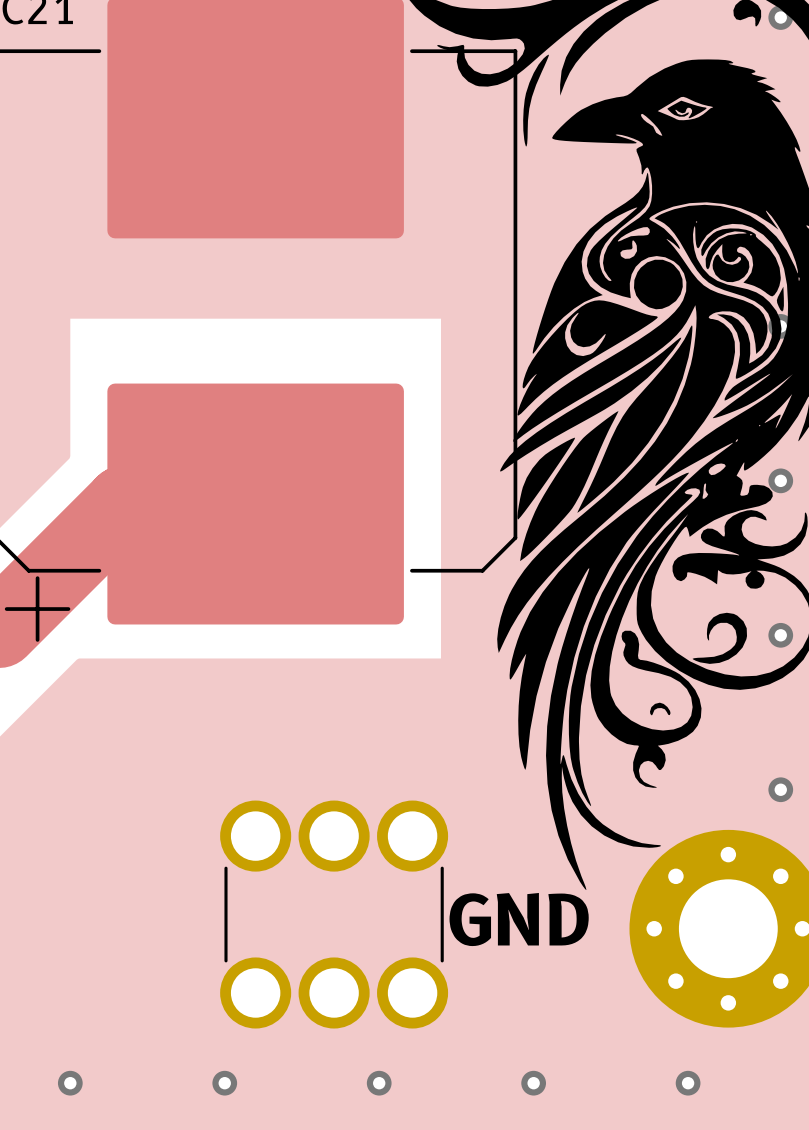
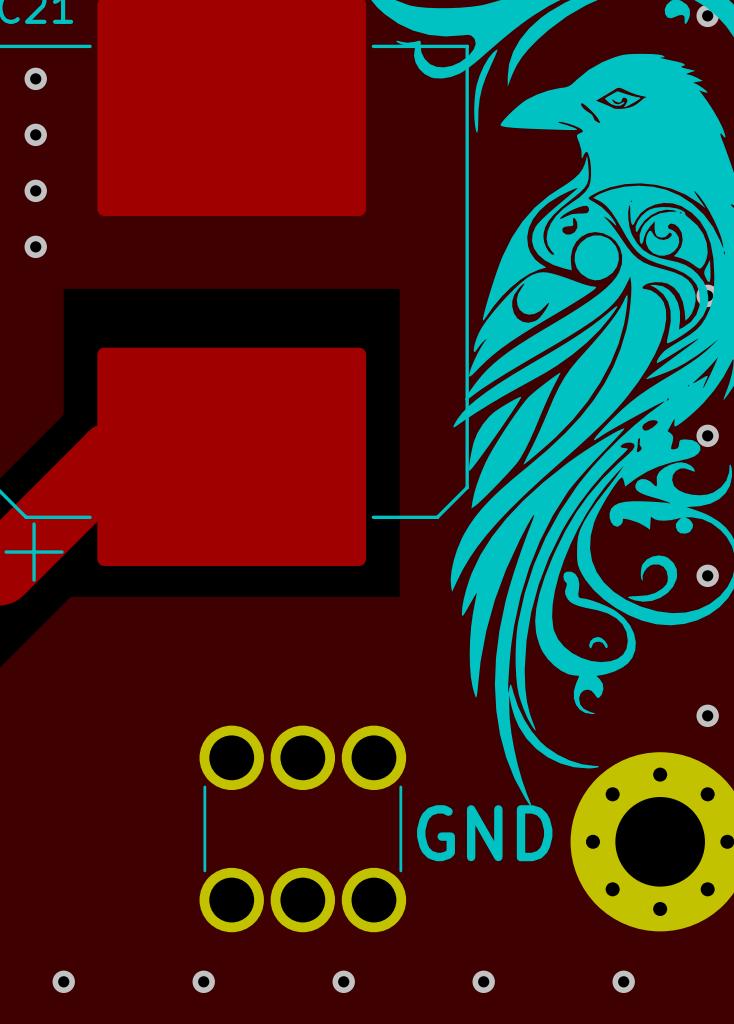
via: none -> (35, 78)
via: none -> (35, 134)
via: none -> (35, 190)
via: none -> (35, 246)

